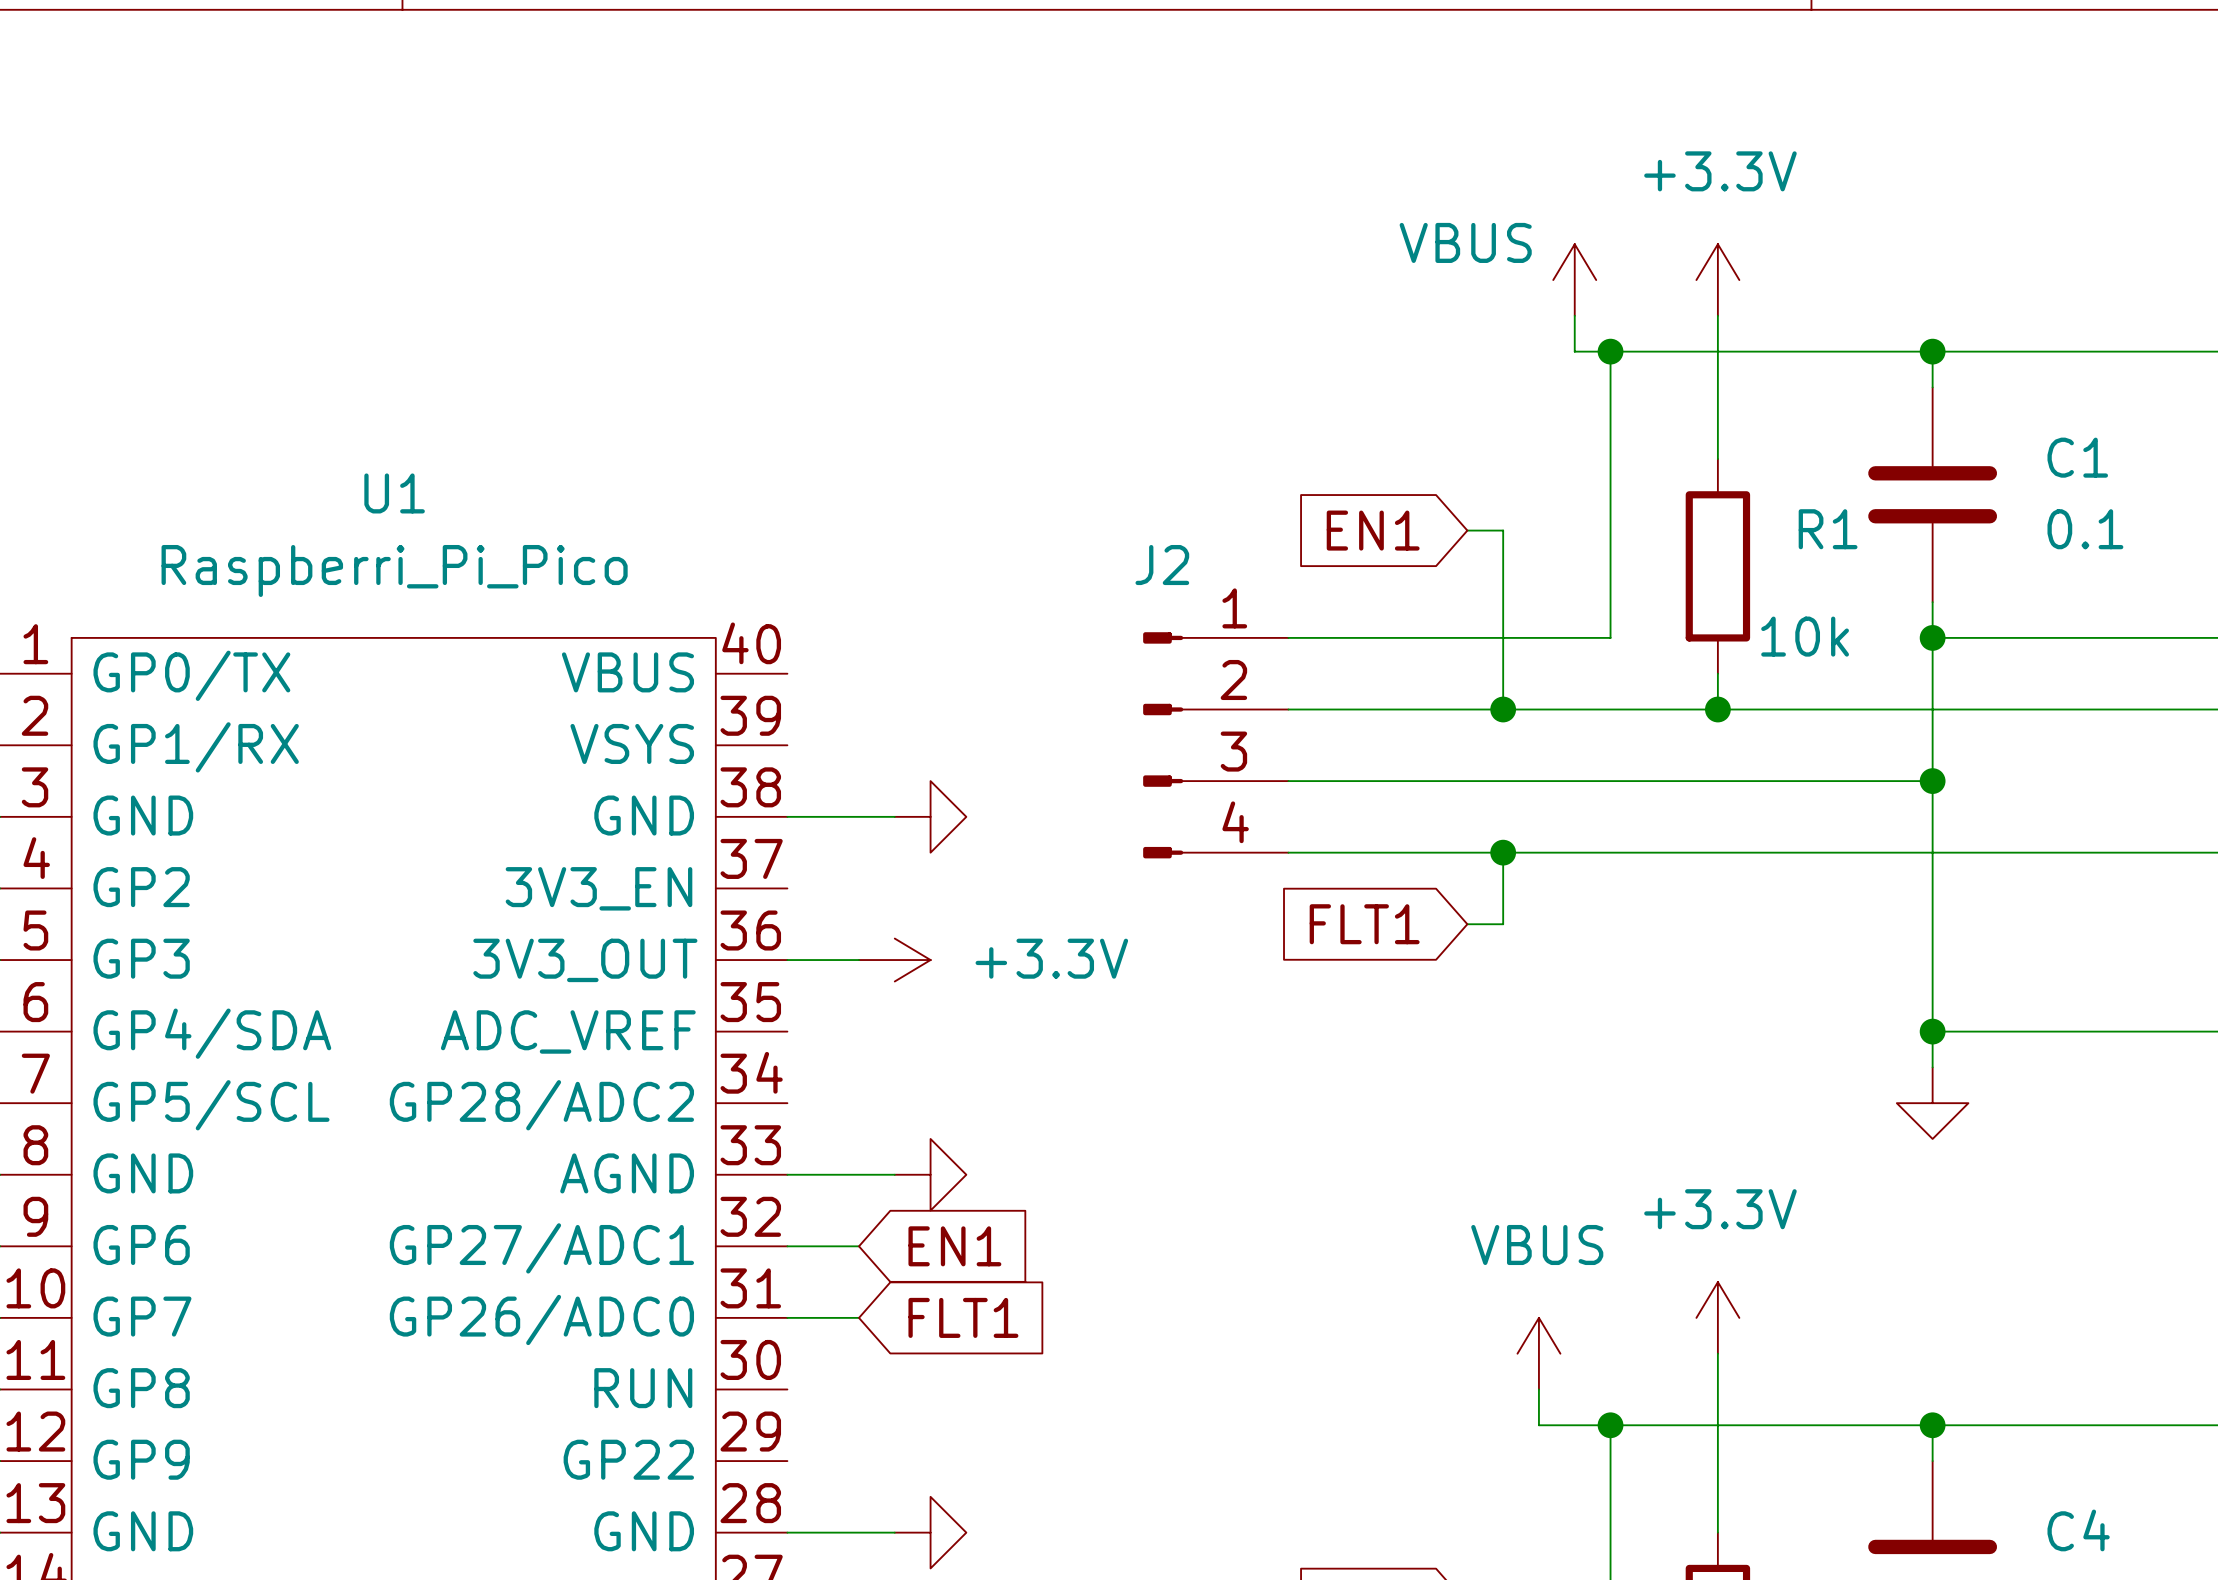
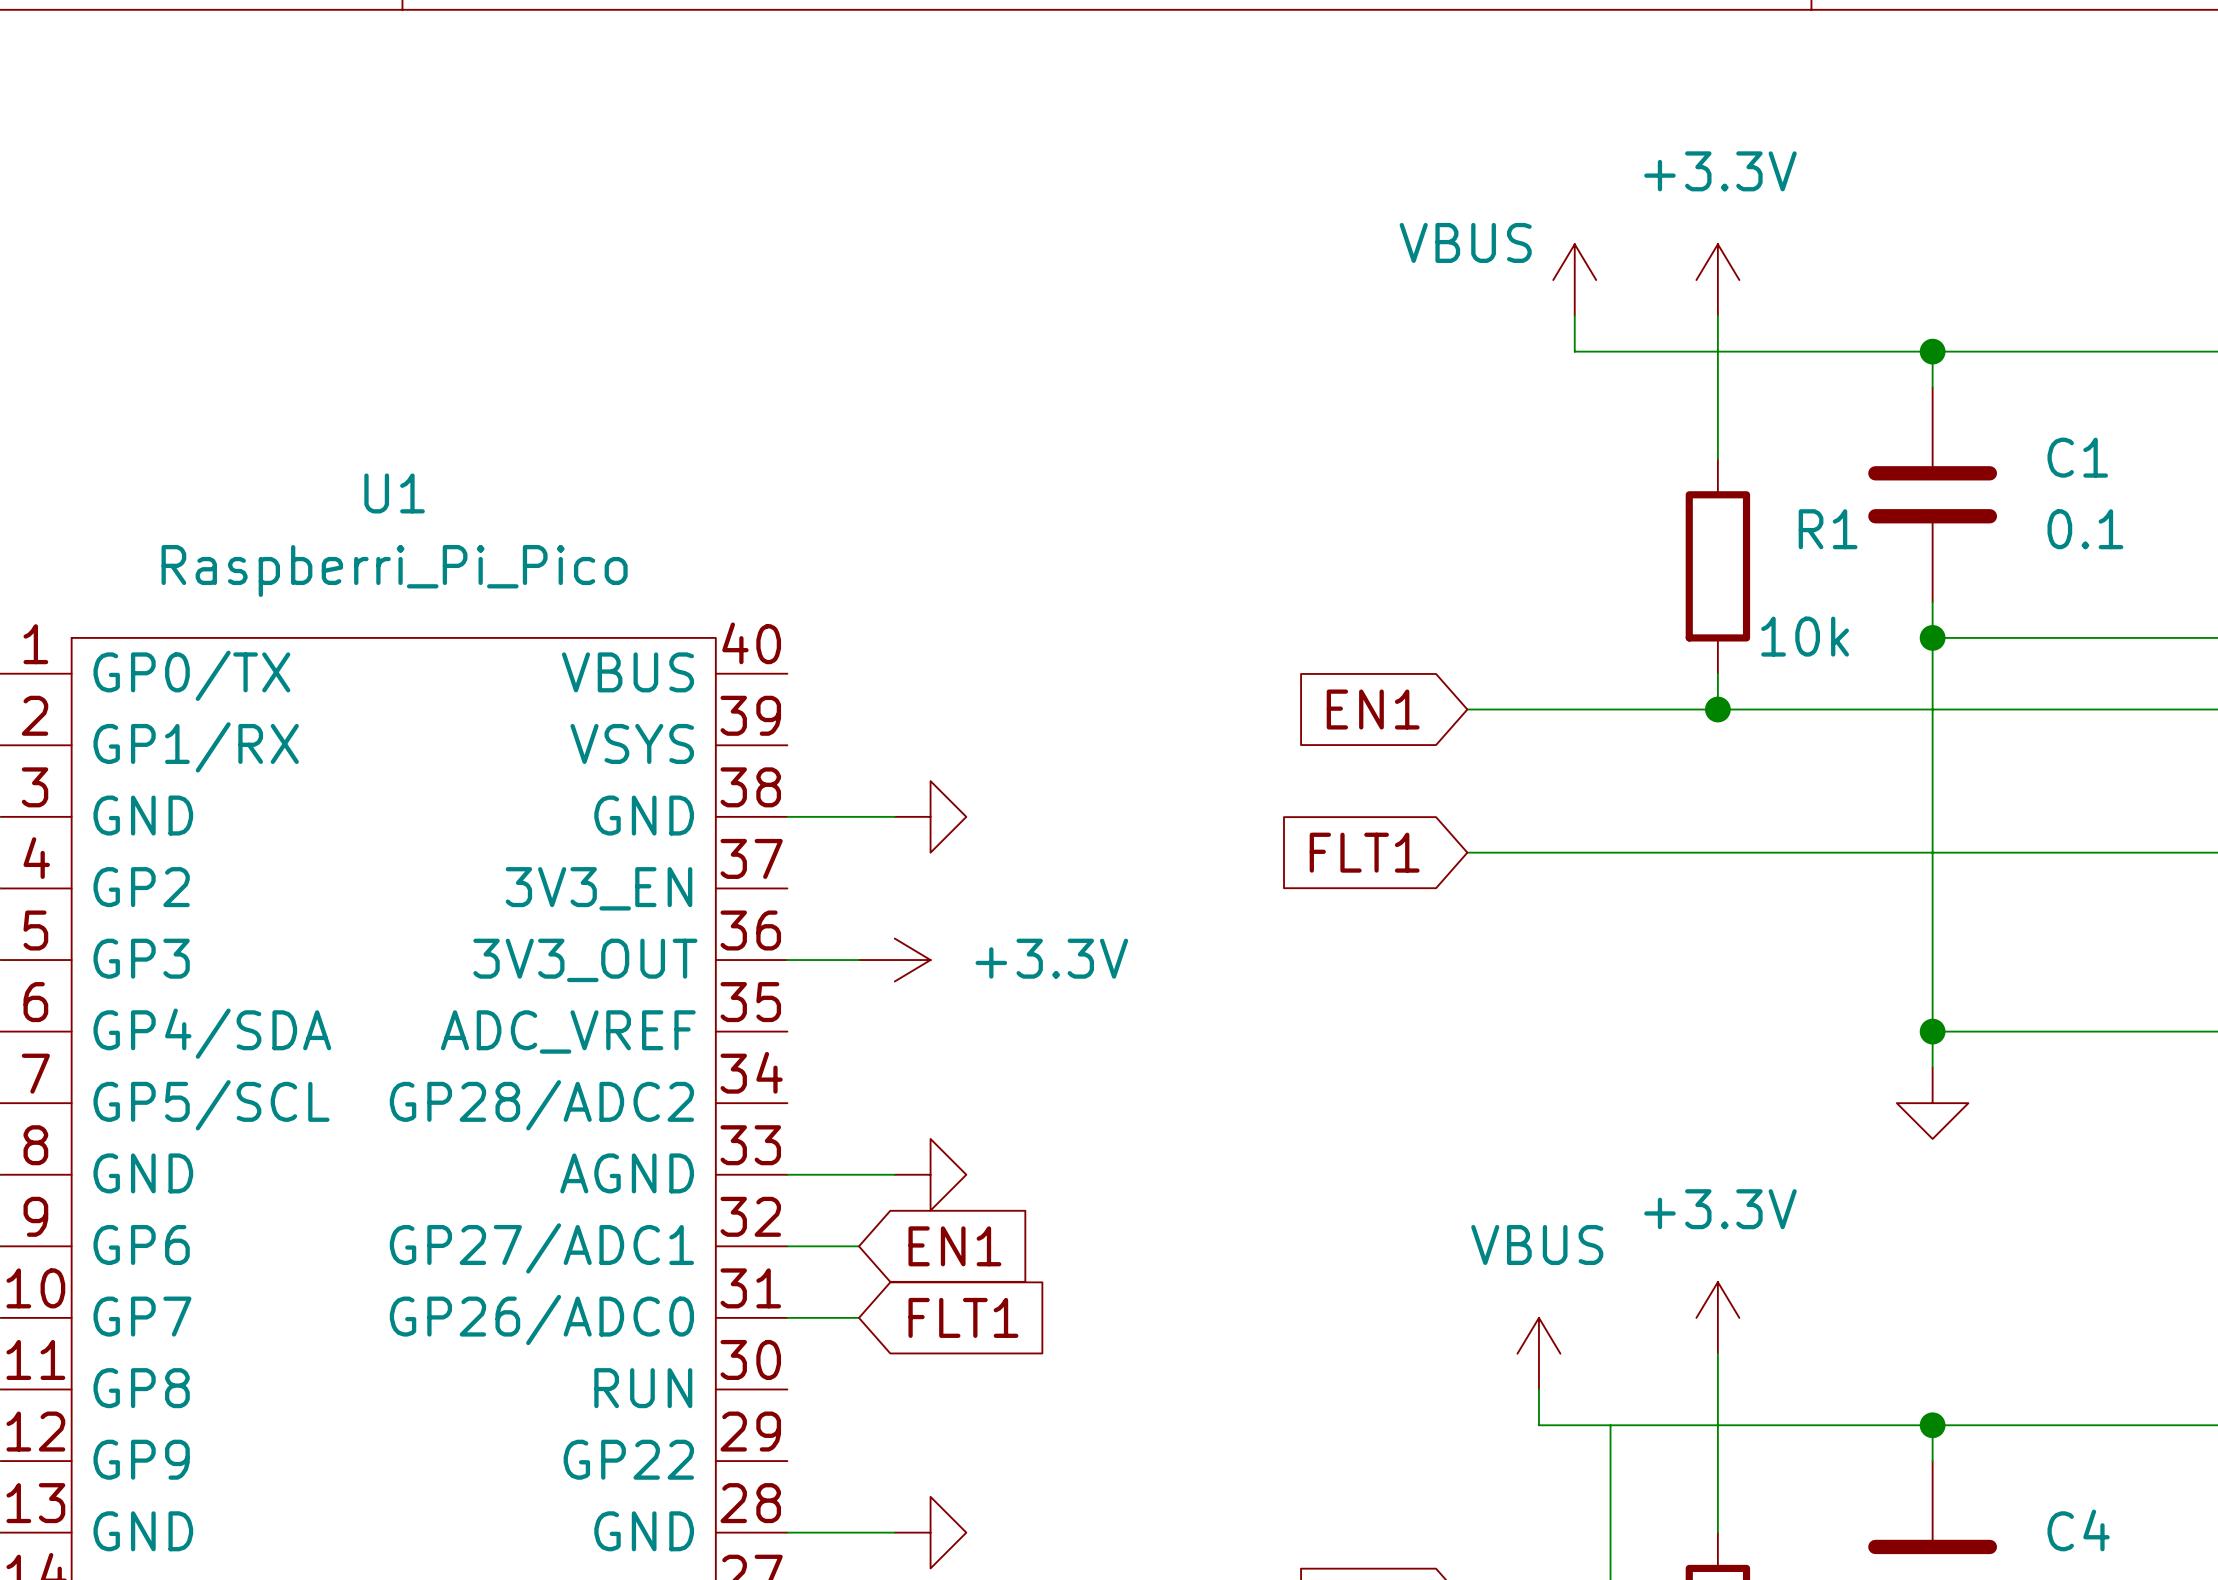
wire: (1610, 351) (1610, 637) (1288, 637) -> none
junction: (1610, 351) -> none
global label position: EN1 (1373, 530) -> EN1 (1373, 709)
wire: (1467, 530) (1503, 530) (1503, 709) -> none
wire: (1288, 709) (1467, 709) -> none
junction: (1503, 709) -> none
J2: (1215, 745) -> none
wire: (1288, 781) (1932, 781) -> none
junction: (1932, 781) -> none
wire: (1288, 852) (1467, 852) -> none
wire: (1503, 852) (1503, 924) (1467, 924) -> none
junction: (1503, 852) -> none
global label position: FLT1 (1364, 924) -> FLT1 (1364, 852)
junction: (1610, 1425) -> none

